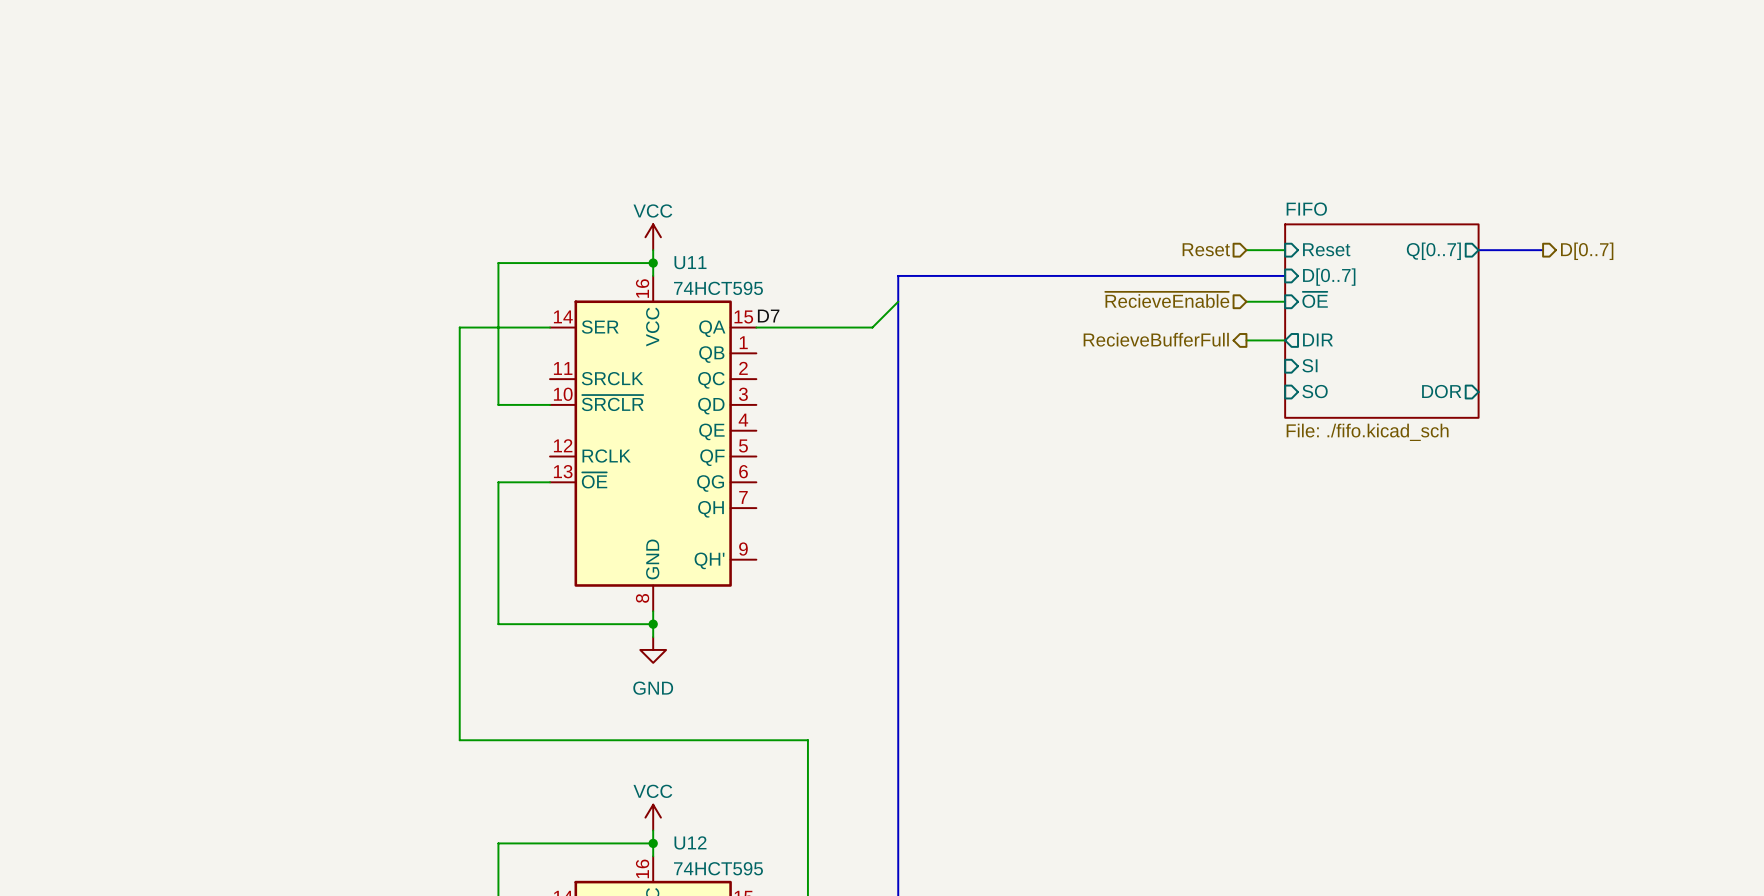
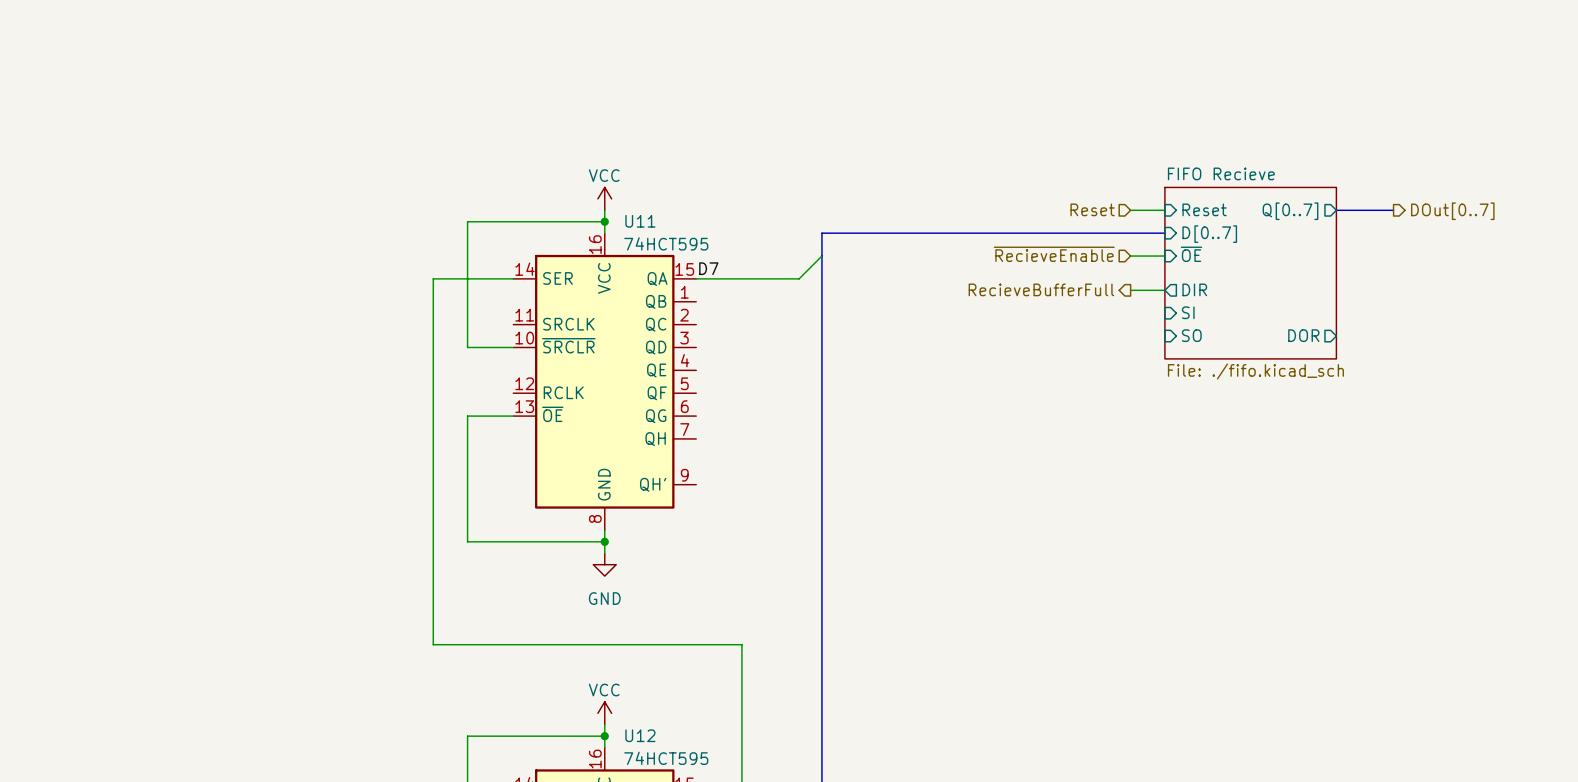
sheet FIFO name: FIFO (1306, 209) -> FIFO Recieve (1221, 173)
hierarchical label: D[0..7] (1587, 251) -> DOut[0..7] (1452, 211)

